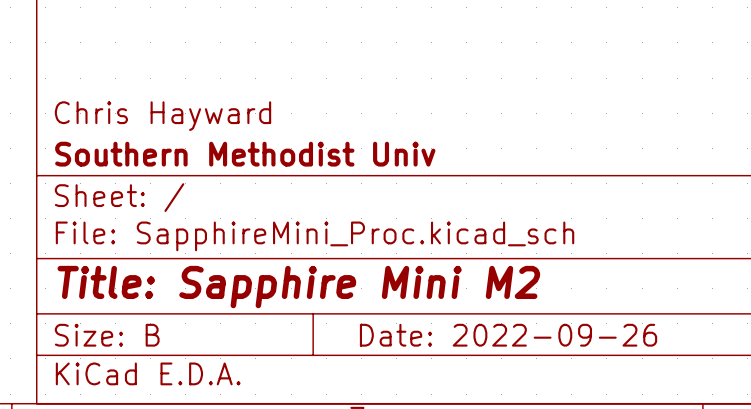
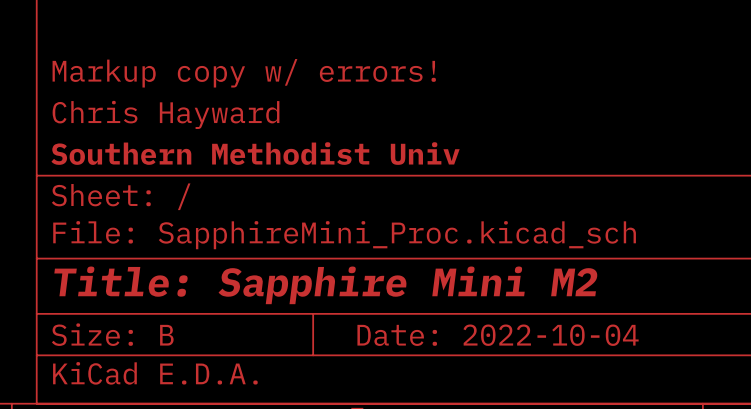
title block: none -> Markup copy w/ errors! (244, 73)
title block: Date: 2022-09-26 (508, 335) -> Date: 2022-10-04 (498, 335)

